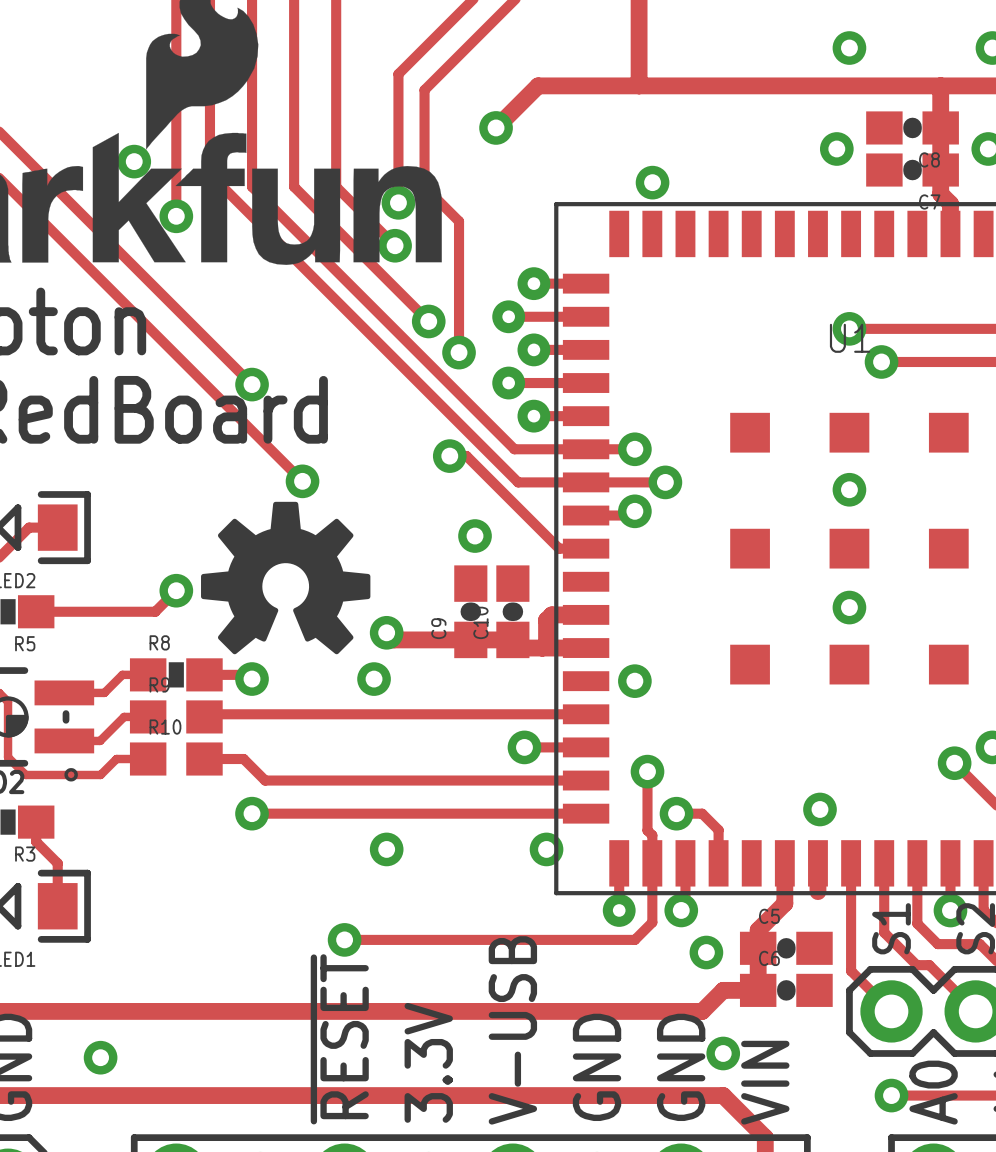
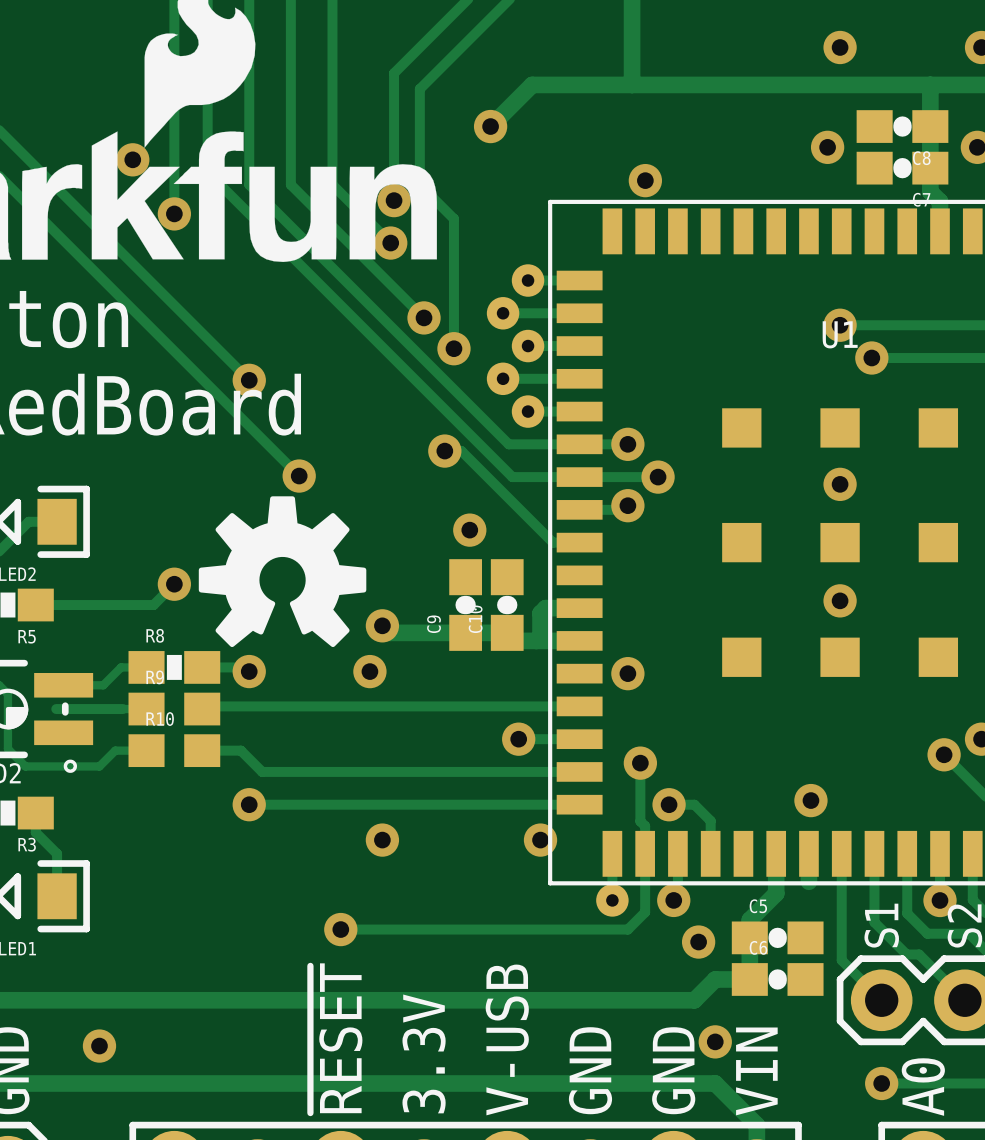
track: (124, 716) (100, 740) (64, 740) -> (122, 709) (56, 709)

